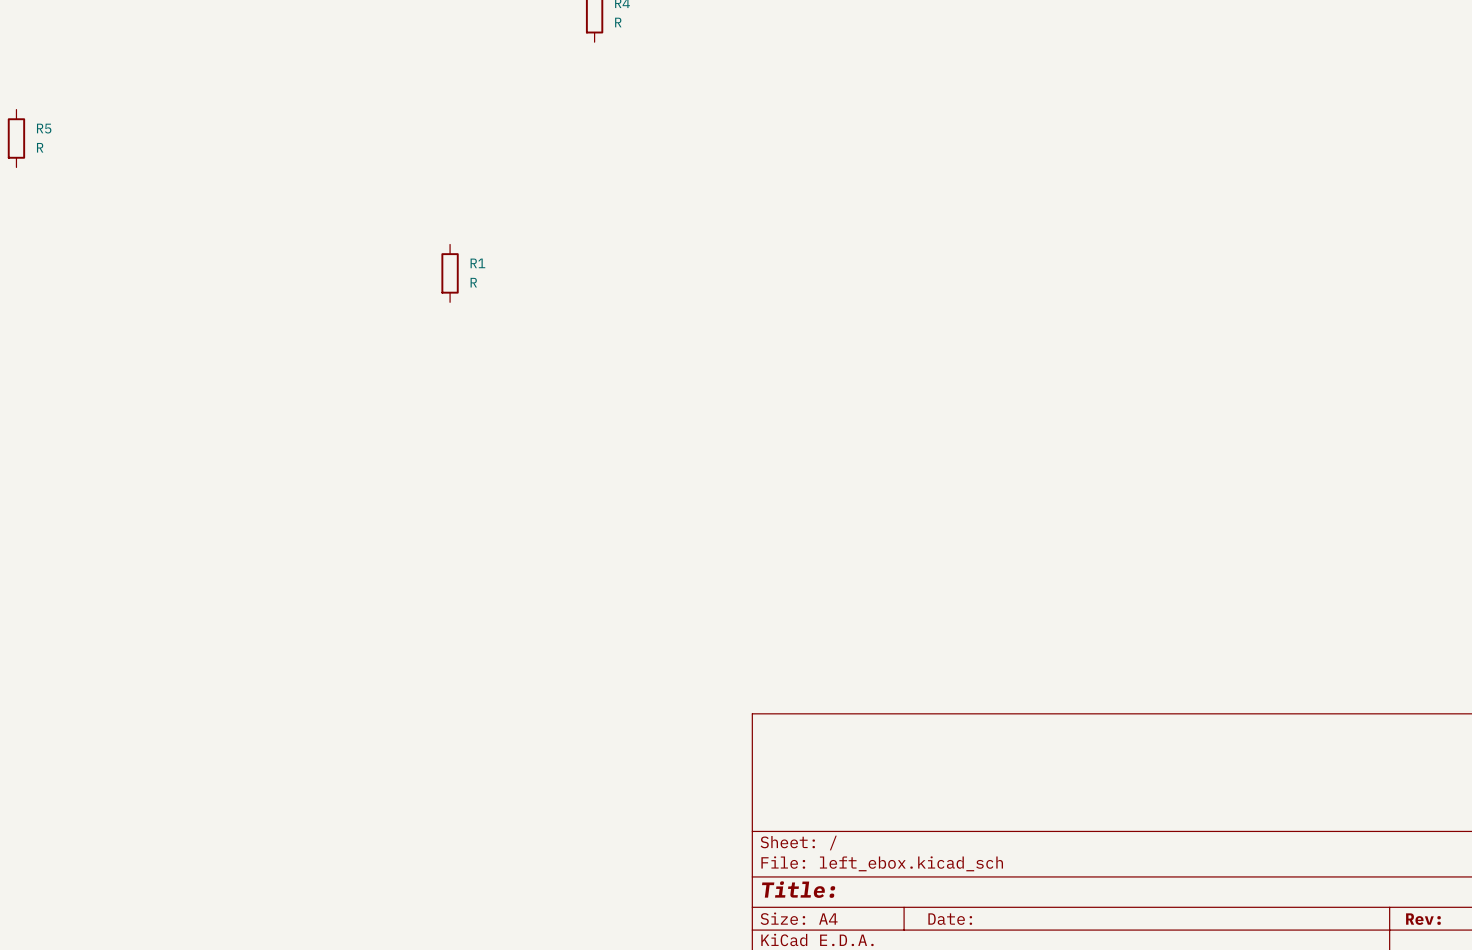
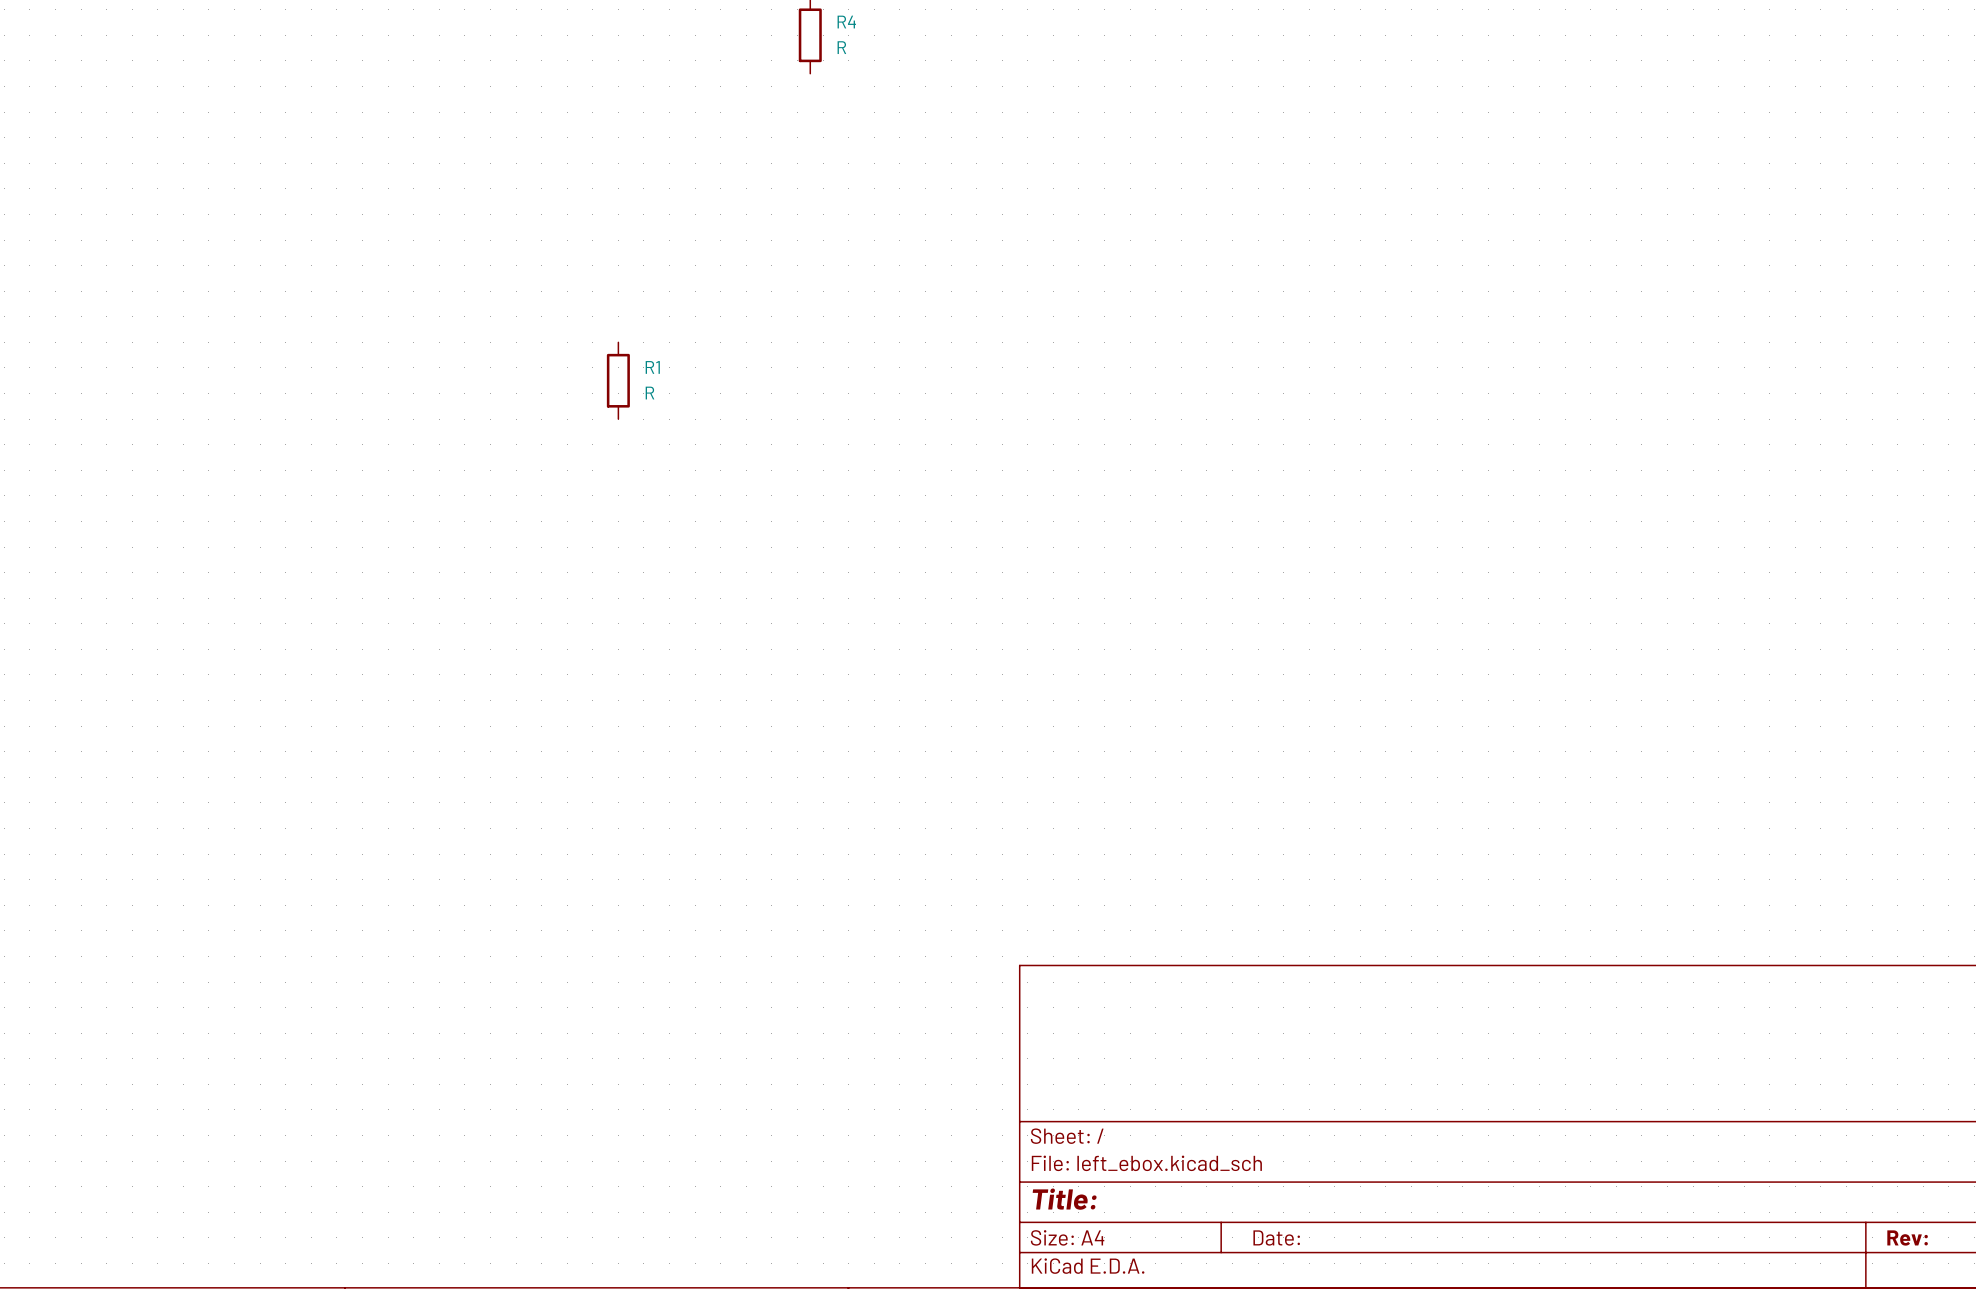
R5: R (16, 138) -> none

